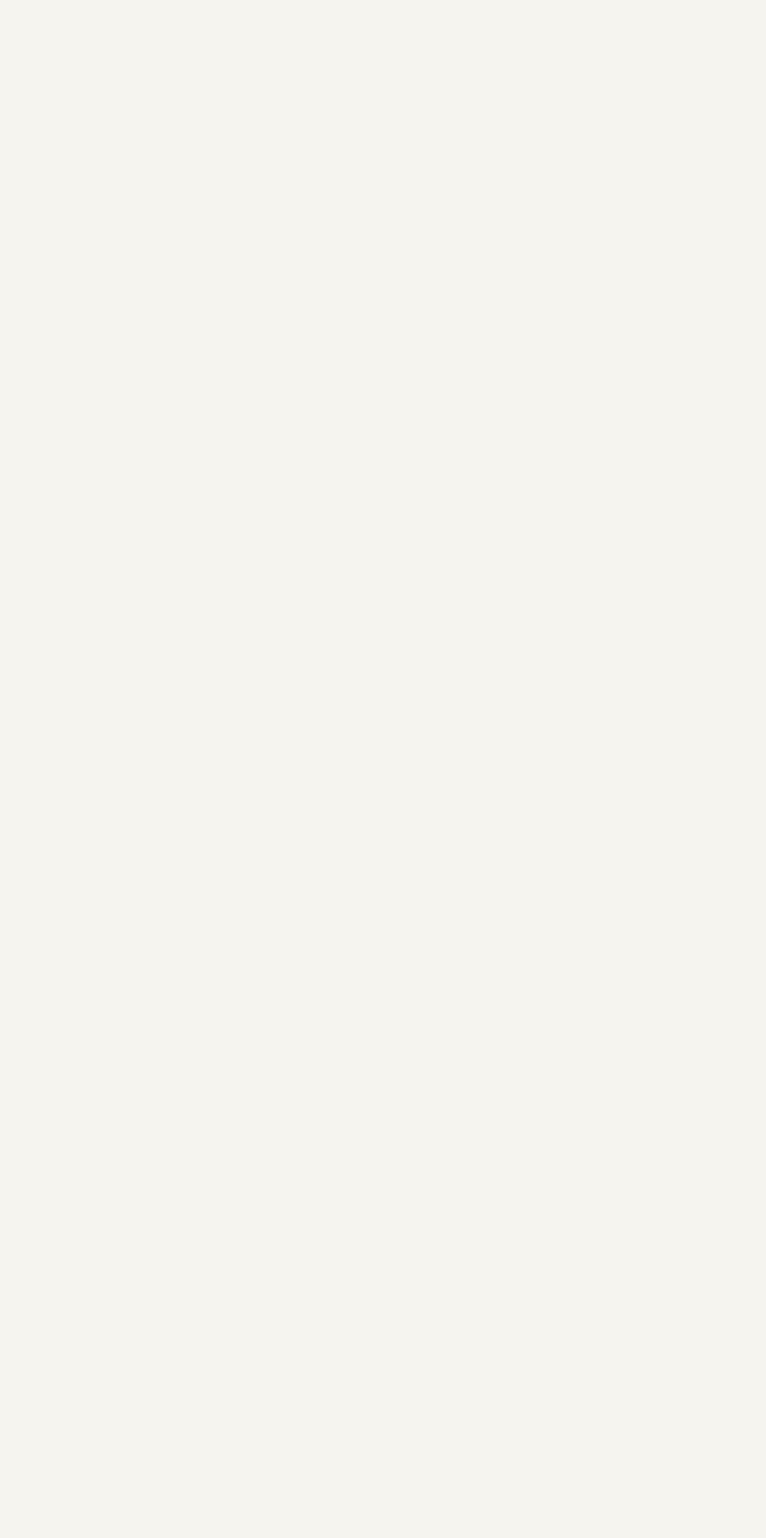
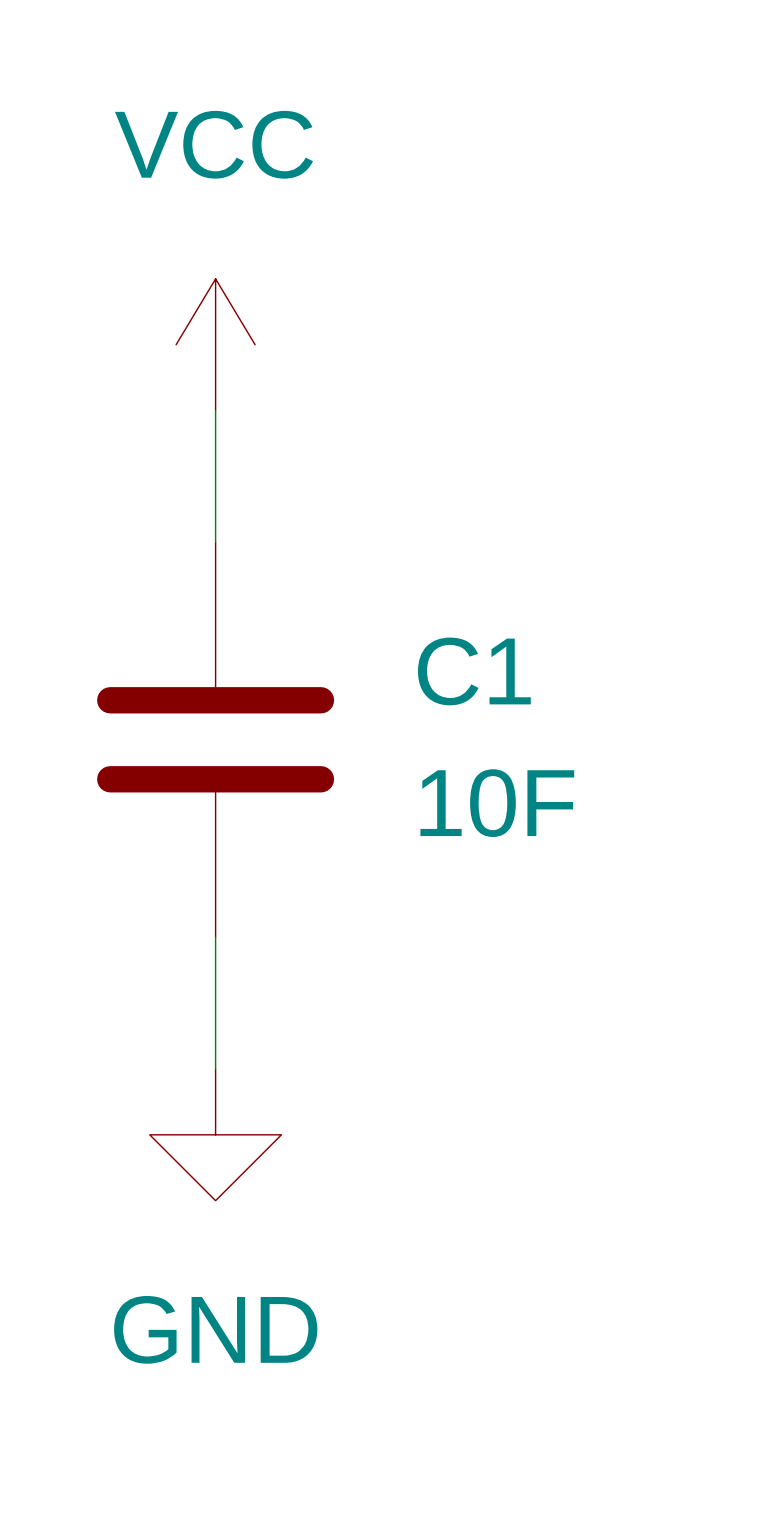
power symbol: none -> VCC (215, 344)
wire: none -> (215, 410) (215, 542)
C1: none -> 10F (215, 739)
wire: none -> (215, 937) (215, 1068)
power symbol: none -> GND (215, 1134)

